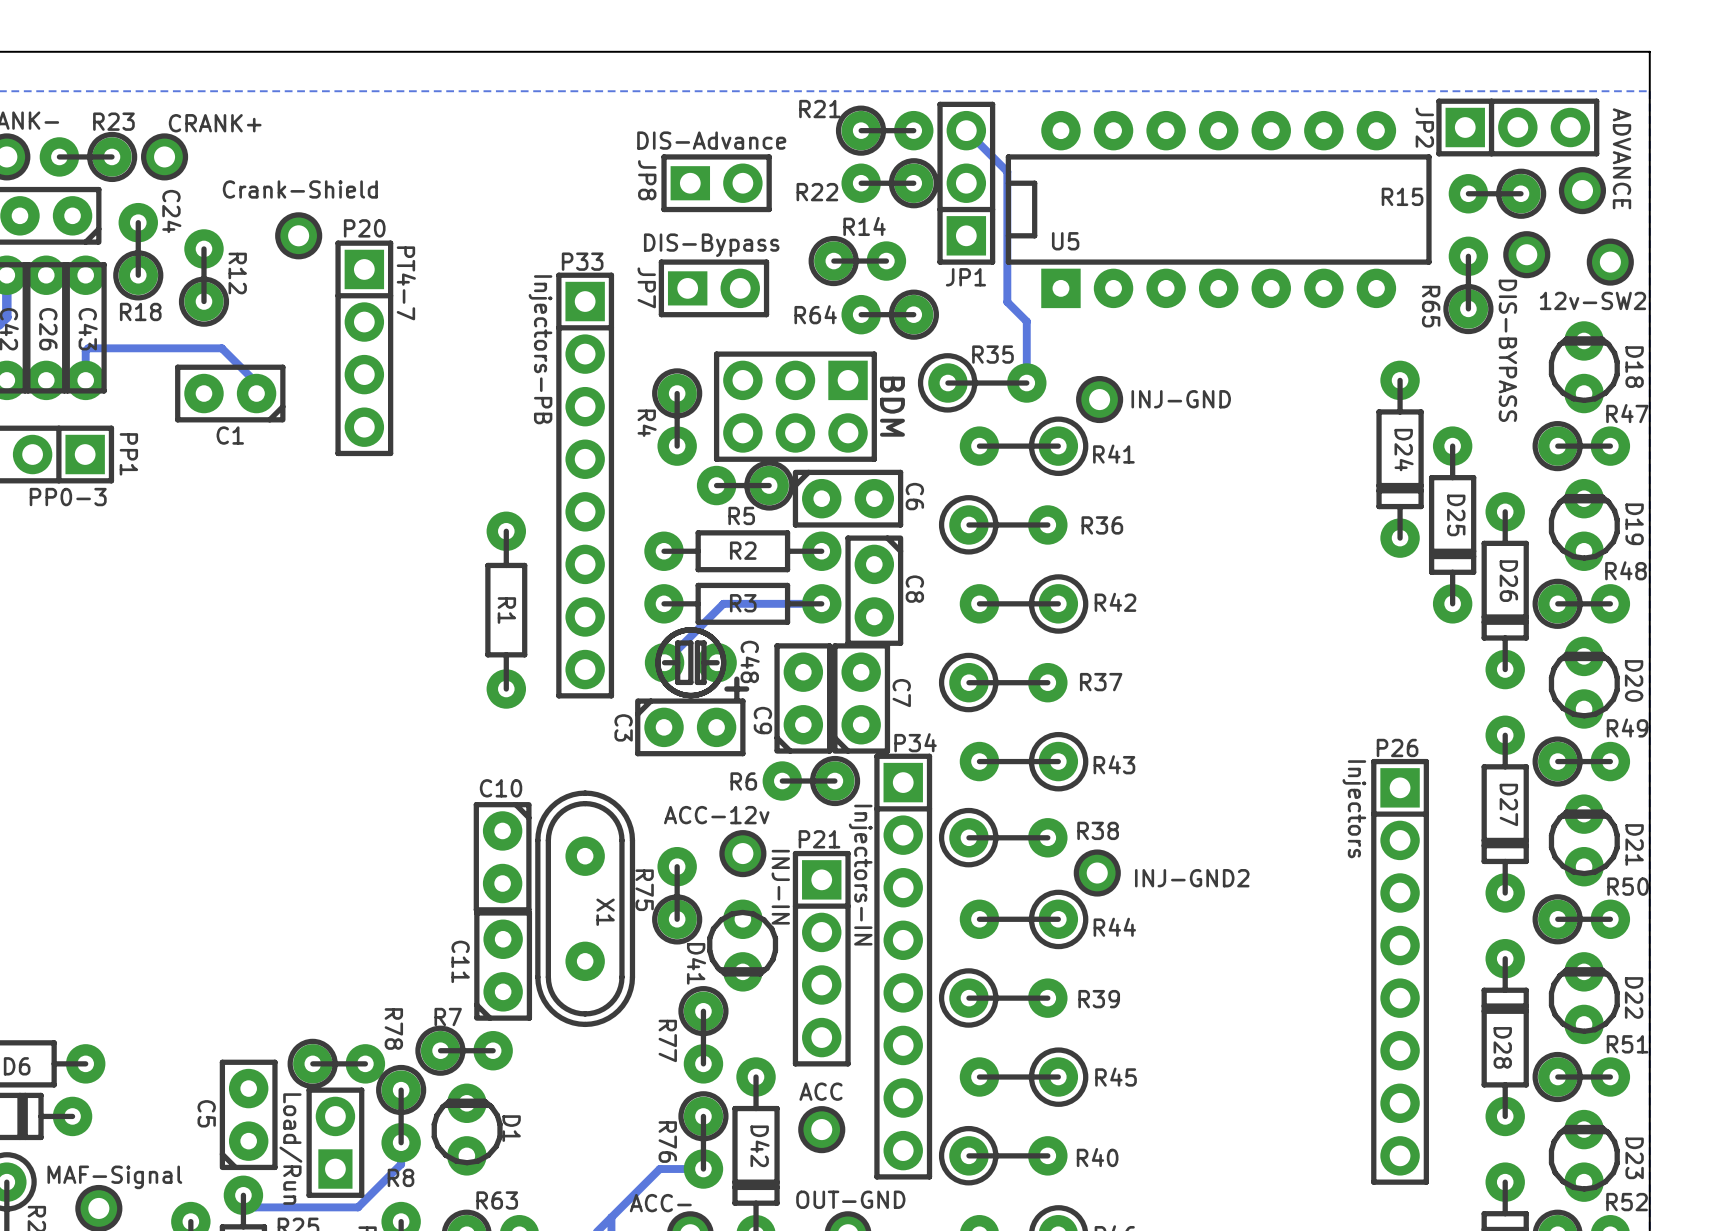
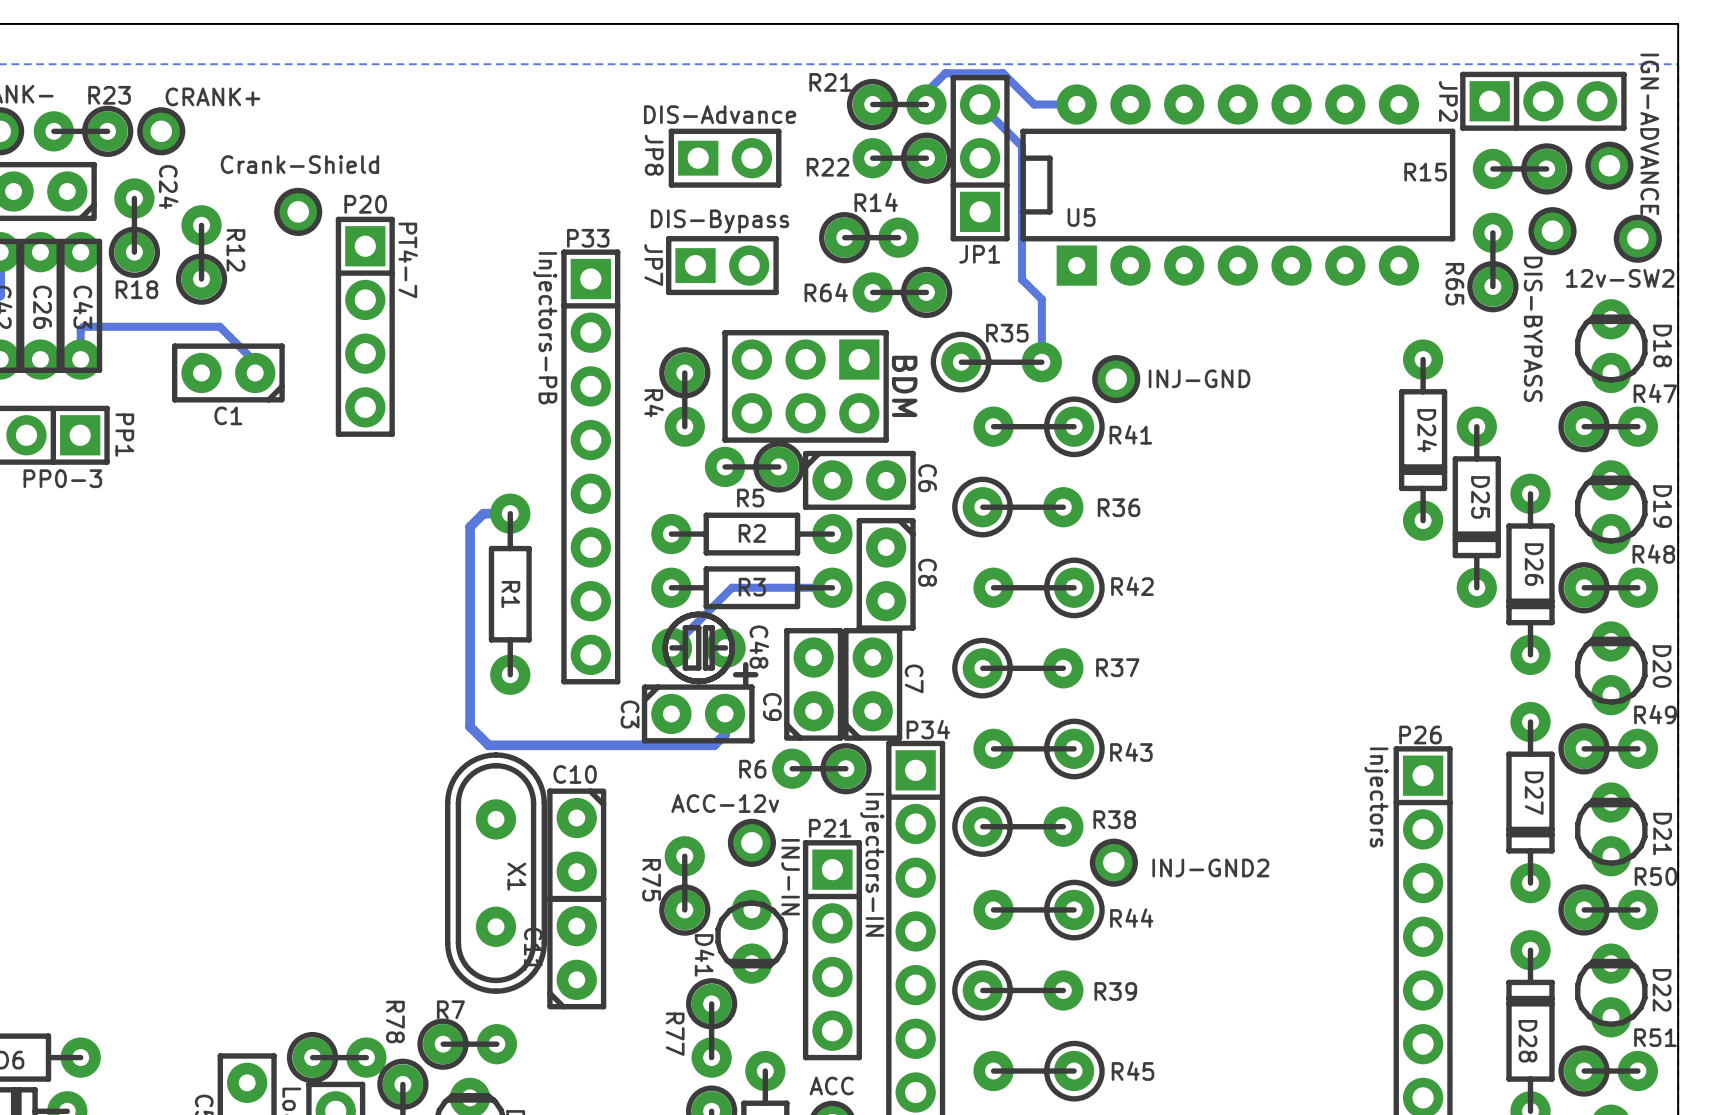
track: none -> (1076, 104) (1034, 104) (1002, 73) (945, 73) (926, 92) (926, 104)
part value: ADVANCE (1621, 158) -> IGN-ADVANCE (1649, 134)
track: none -> (510, 513) (483, 513) (470, 526) (470, 726) (488, 745) (714, 745) (725, 734) (725, 713)
C10 position: (502, 857) -> (576, 844)
X1 position: (585, 908) -> (496, 873)
C11 position: (503, 965) -> (576, 952)

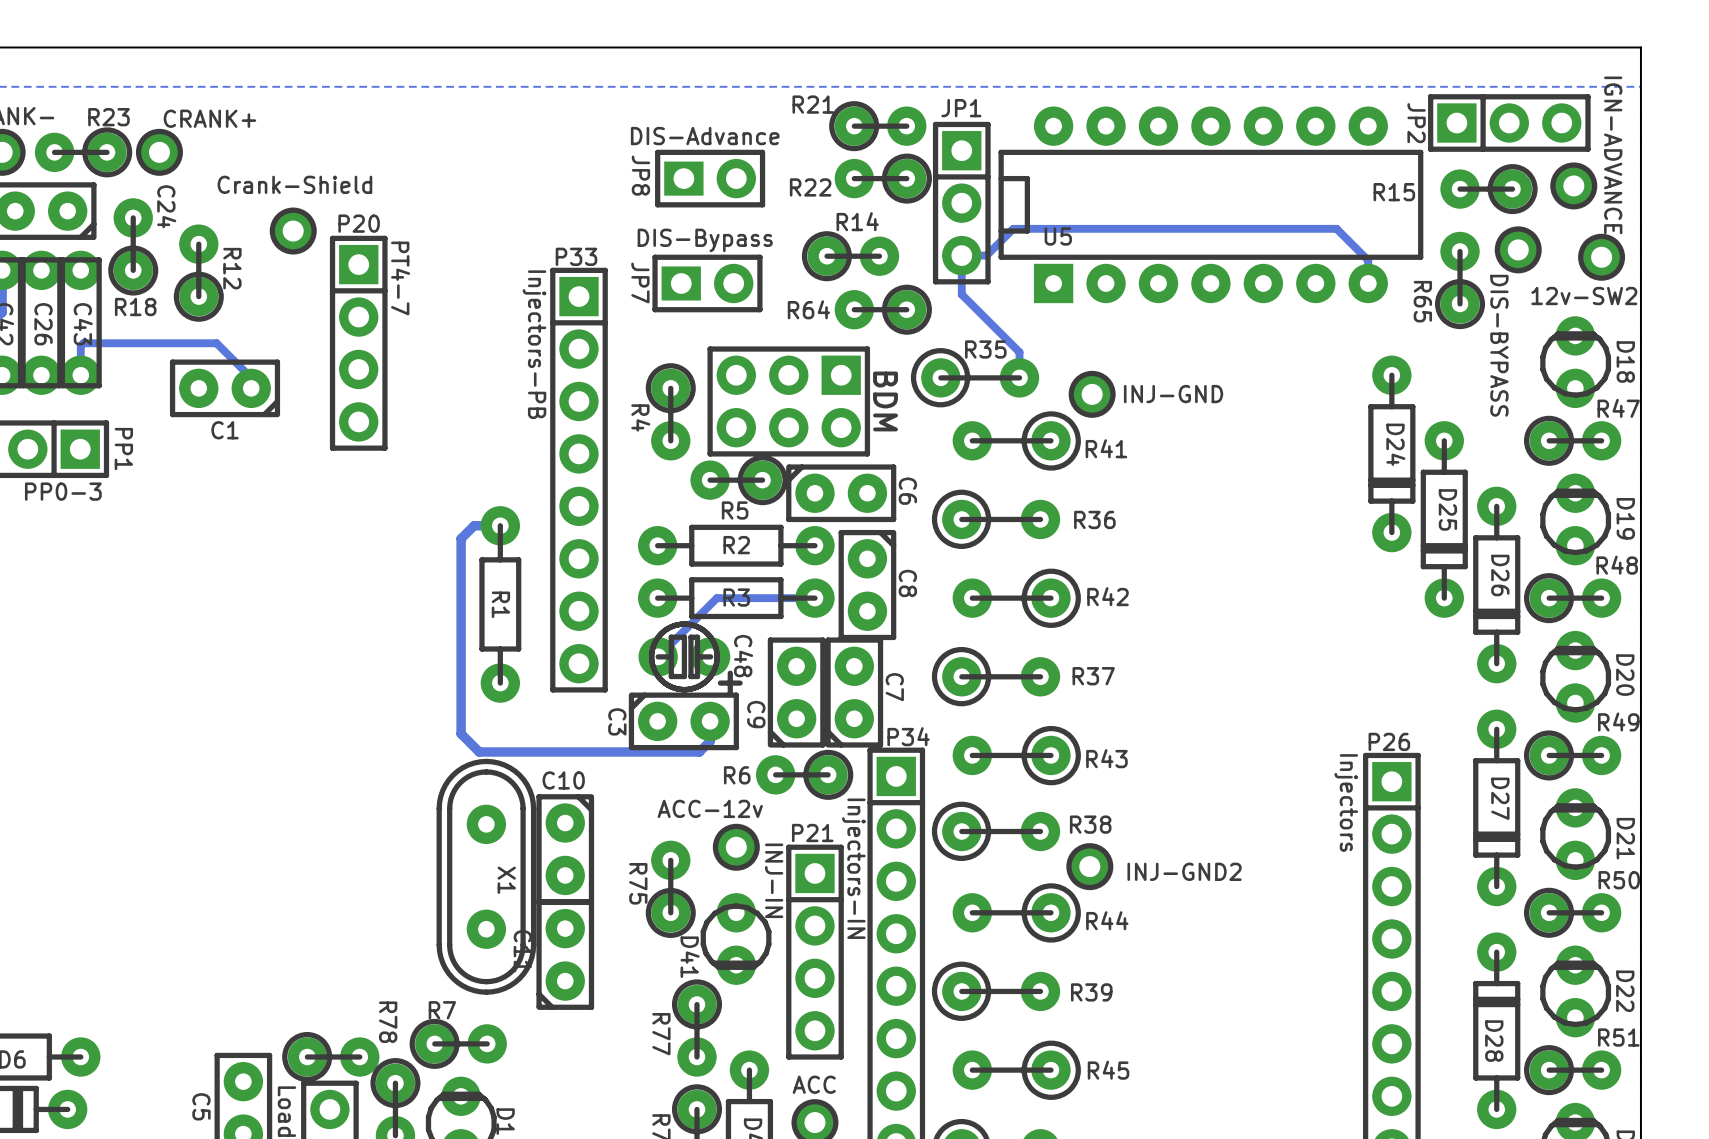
track: (980, 104) (1022, 146) (1022, 279) (1041, 299) (1041, 335) -> (1368, 283) (1368, 260) (1336, 228) (1013, 228) (986, 255) (961, 255) (961, 294) (1019, 352)
track: (1076, 104) (1034, 104) (1002, 73) (945, 73) (926, 92) (926, 104) -> none
JP1 rotation: 0° (980, 158) -> 180° (961, 203)

